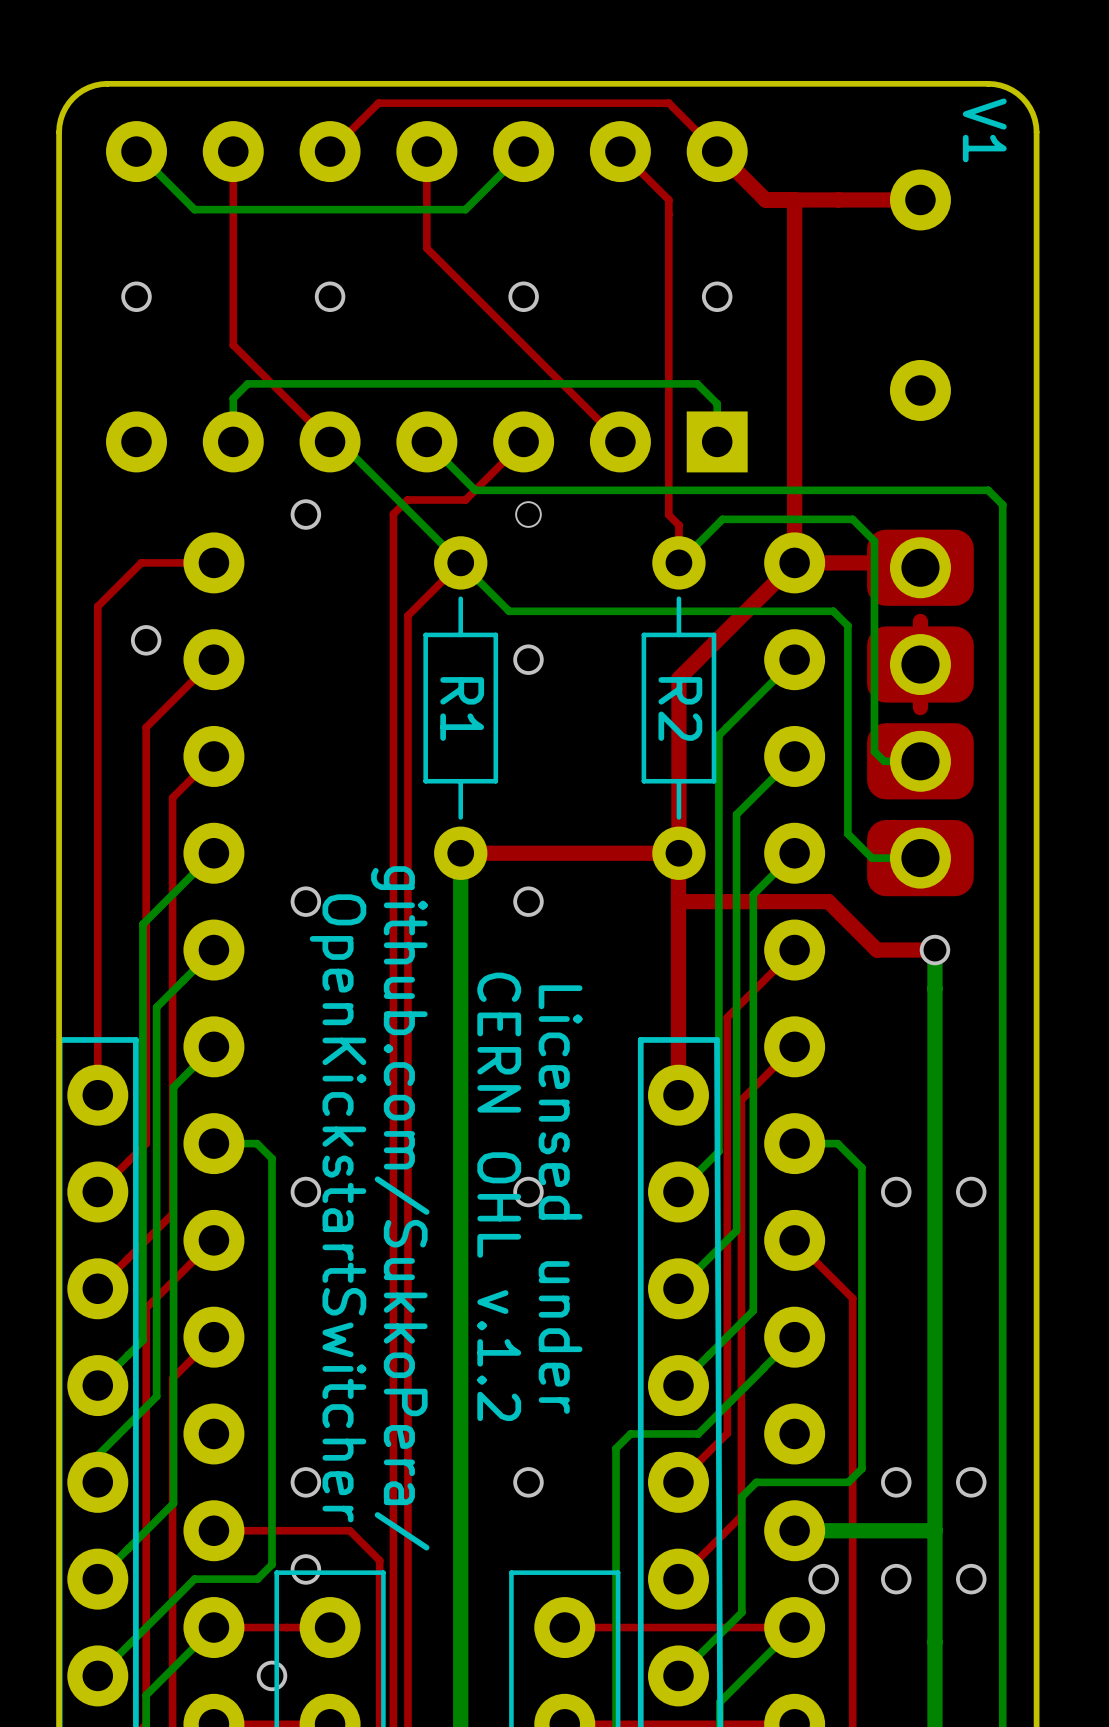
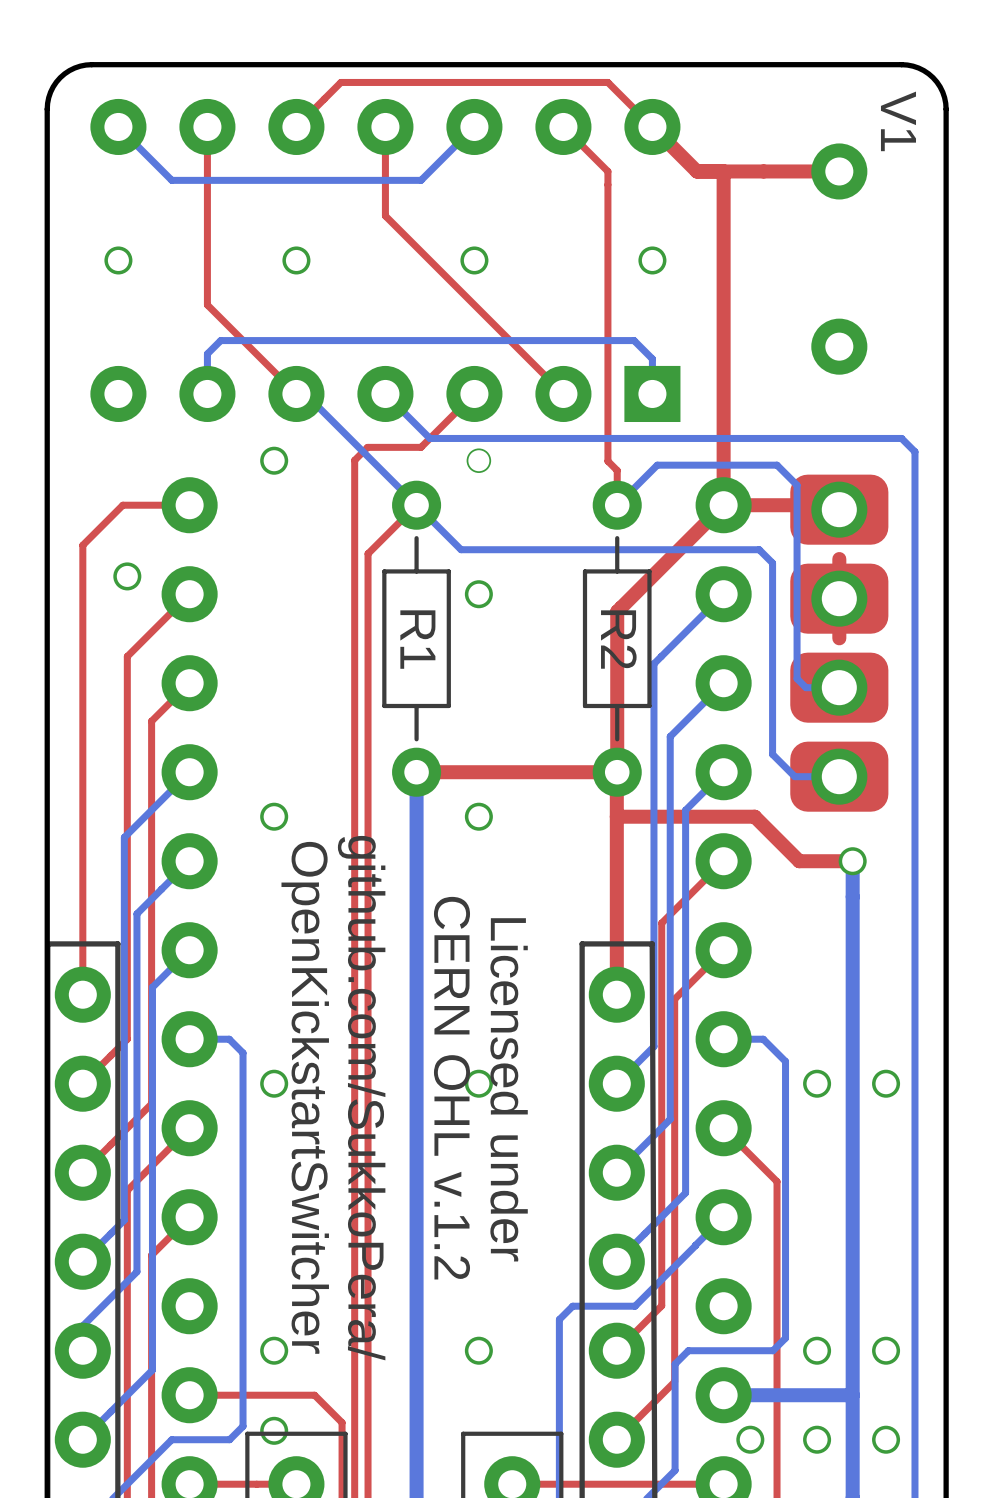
text position: V1 (984, 130) -> V1 (898, 121)

